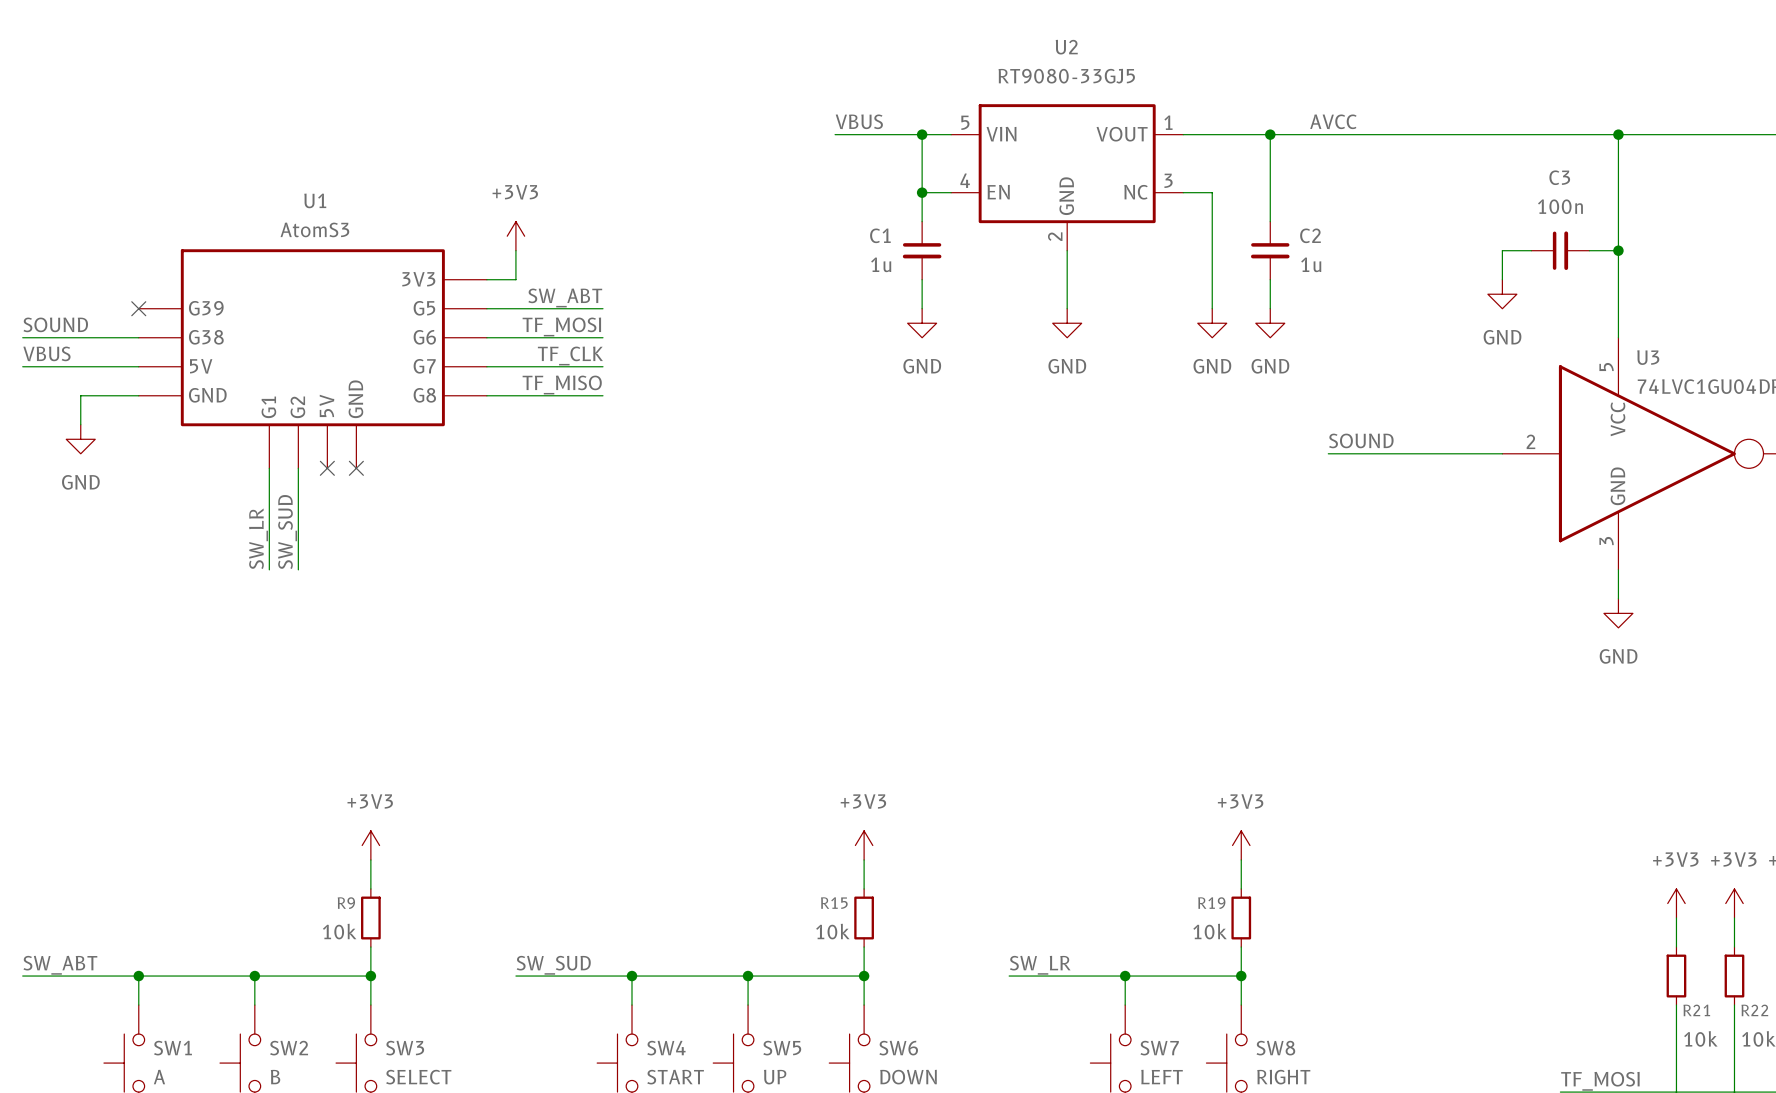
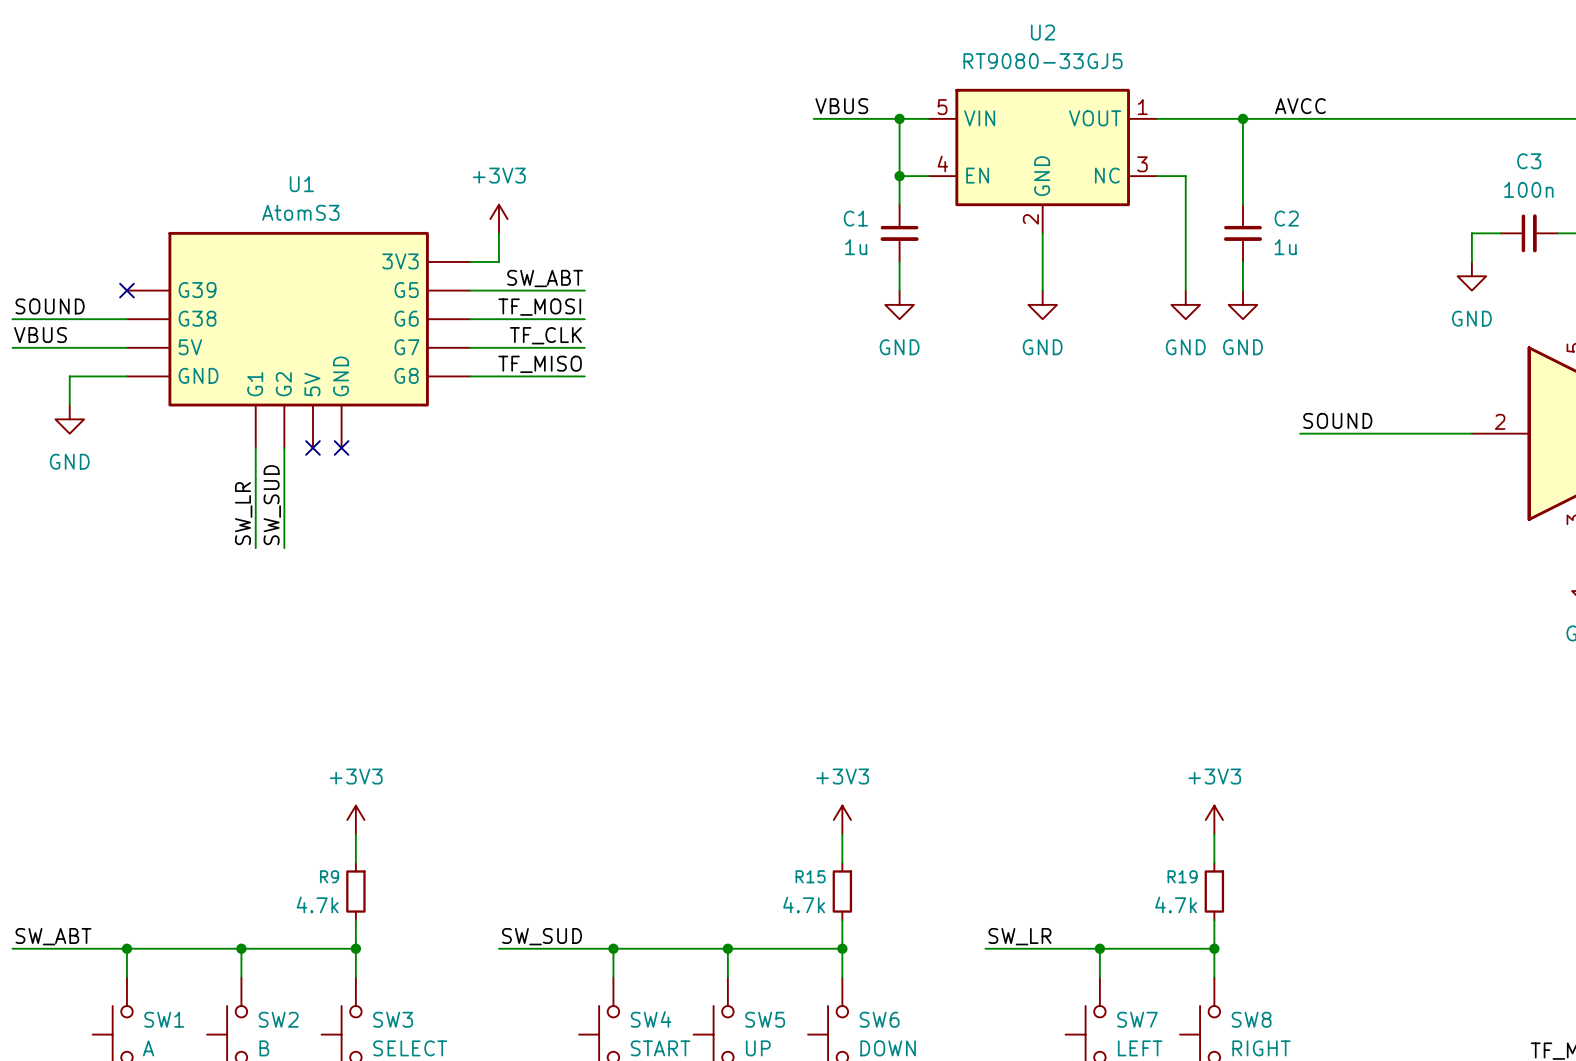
R9 value: 10k (339, 931) -> 4.7k (317, 904)
R15 value: 10k (832, 931) -> 4.7k (804, 904)
R19 value: 10k (1210, 931) -> 4.7k (1176, 904)

